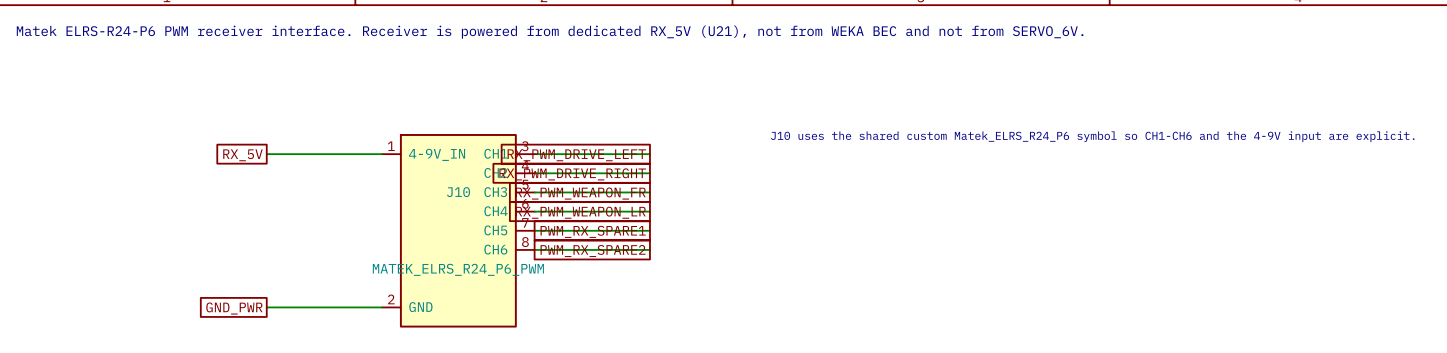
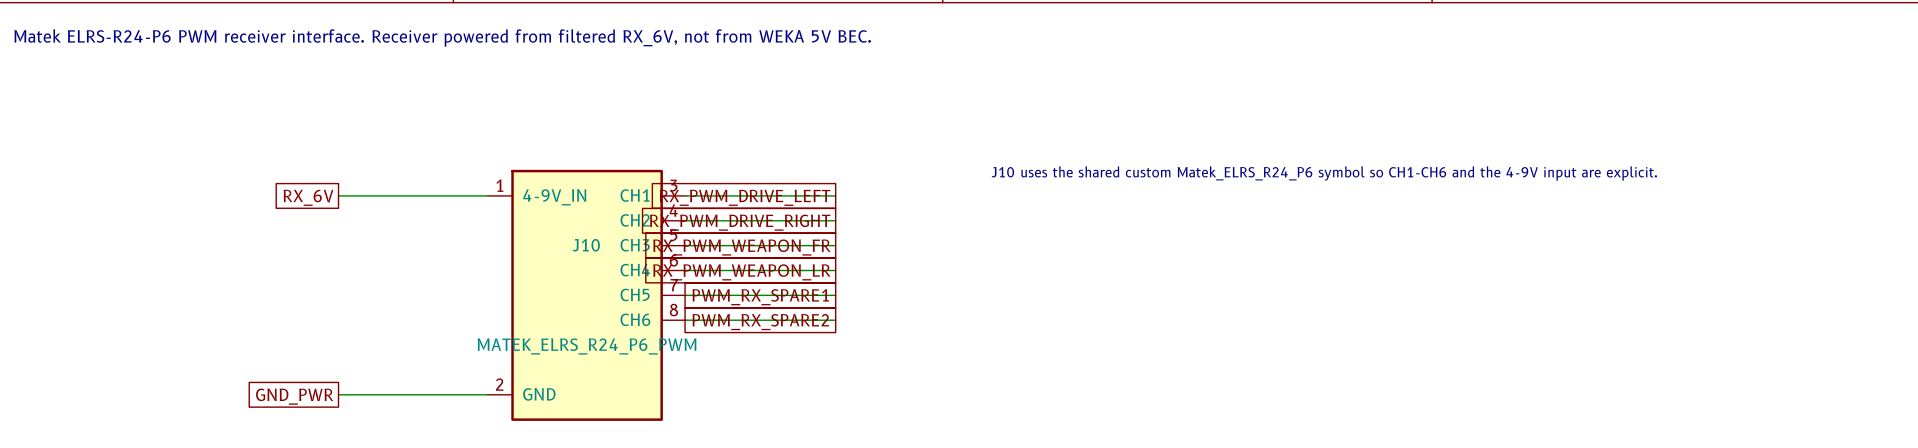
text: Matek ELRS-R24-P6 PWM receiver interface. Receiver is powered from dedicated RX_5V (U21), not from WEKA BEC and not from SERVO_6V. (550, 32) -> Matek ELRS-R24-P6 PWM receiver interface. Receiver powered from filtered RX_6V, not from WEKA 5V BEC. (442, 38)
global label: RX_5V (242, 155) -> RX_6V (308, 197)

